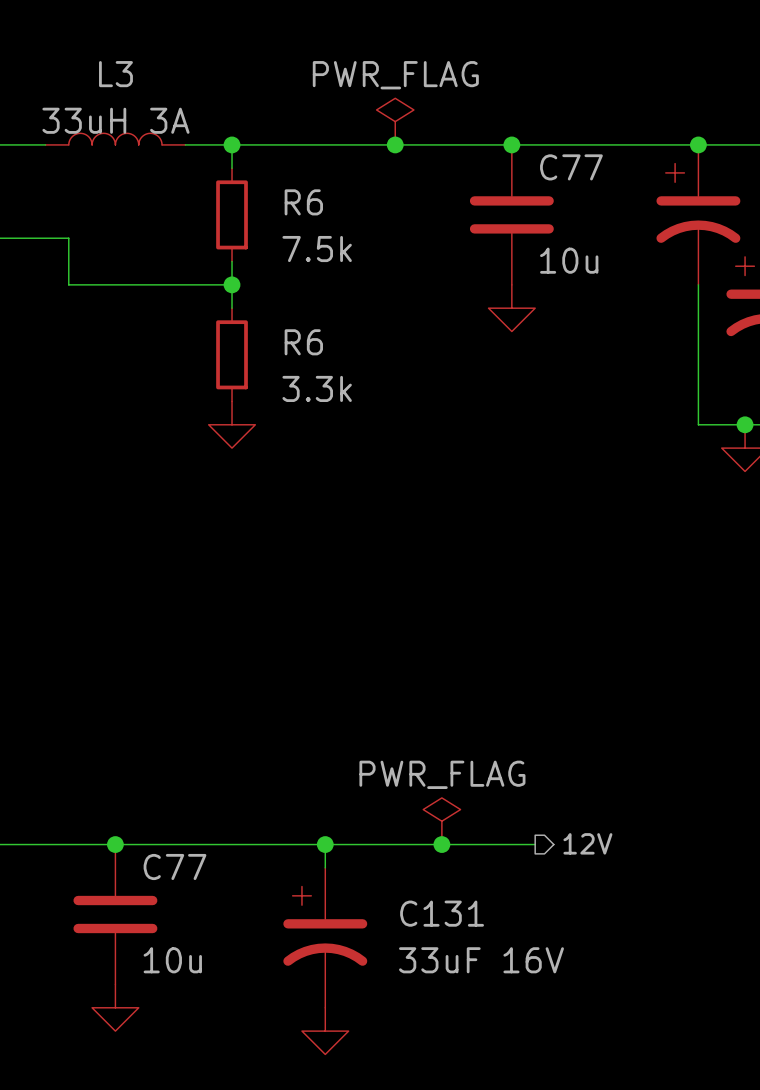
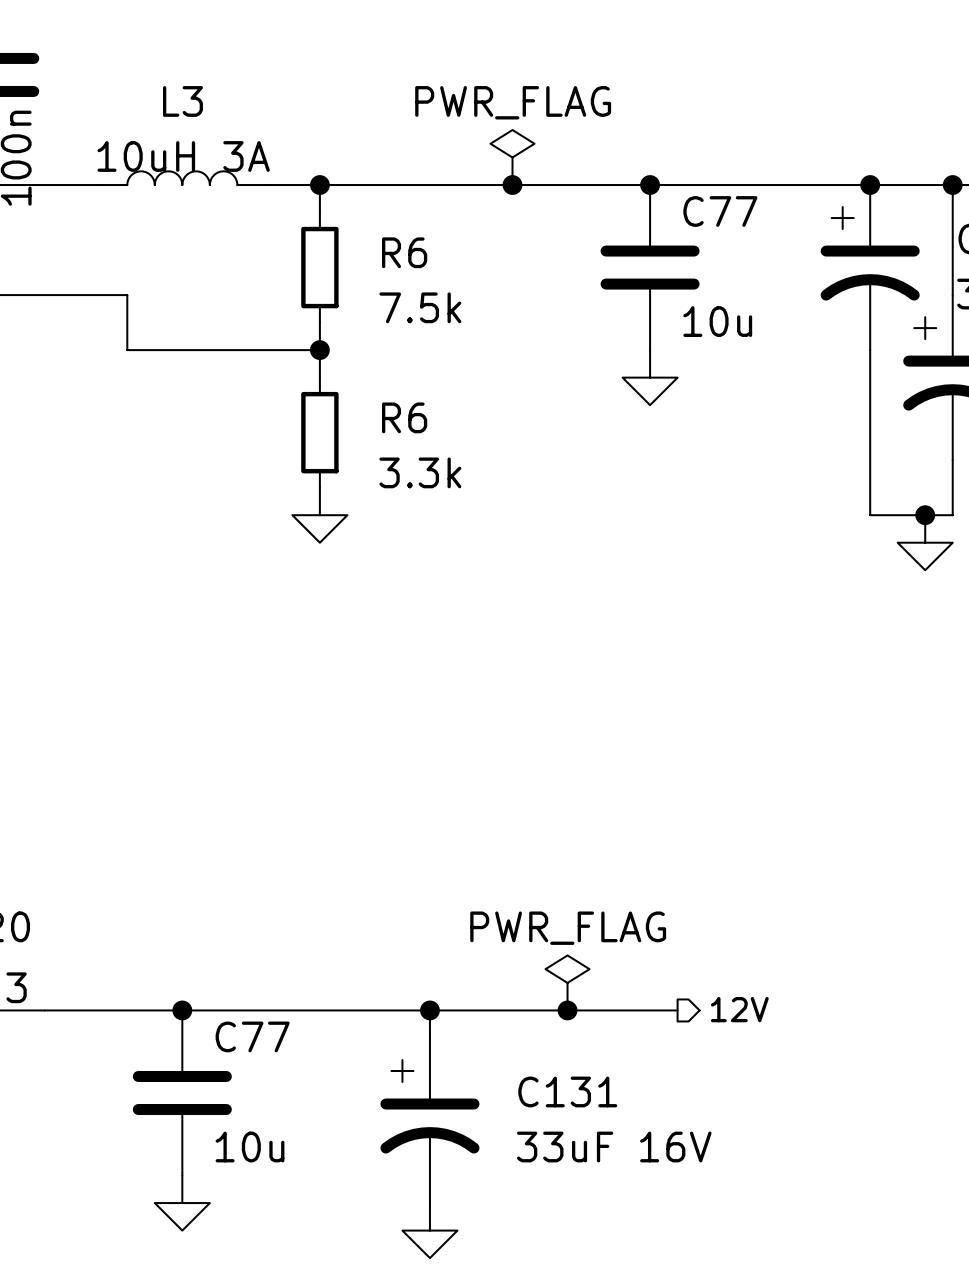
L3 value: 33uH 3A (115, 120) -> 10uH 3A (183, 156)

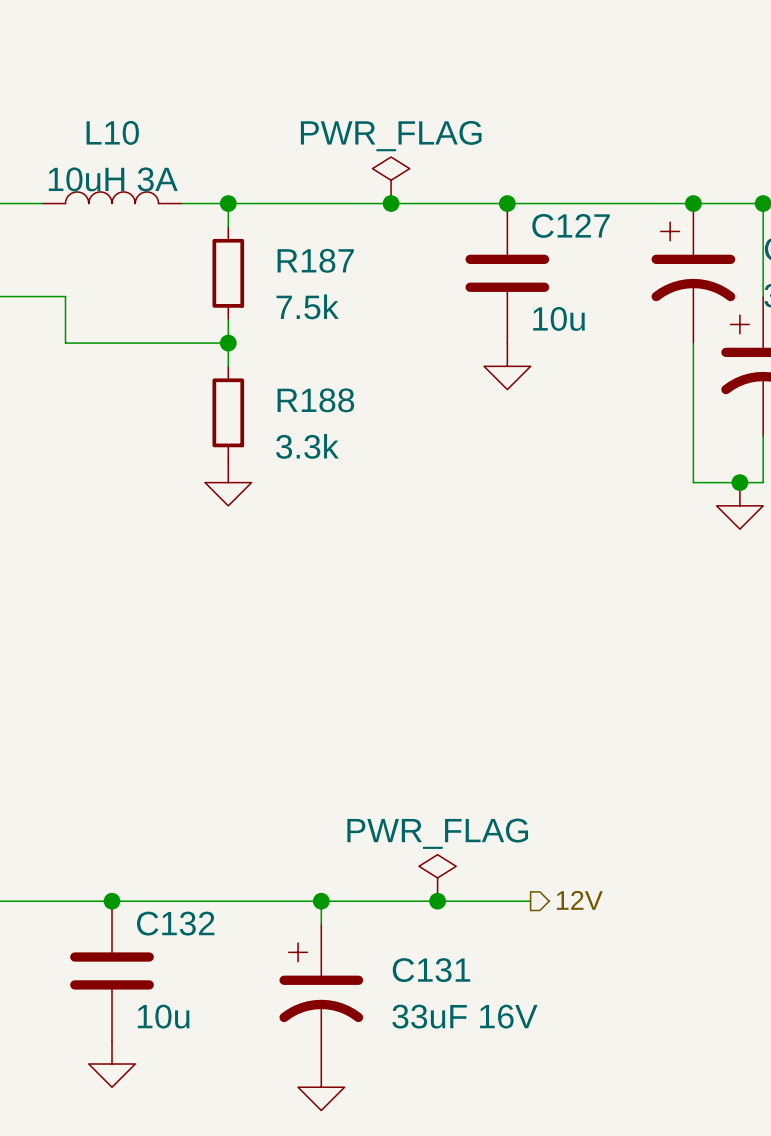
L3 name: L3 (182, 101) -> L10 (112, 132)
C77 name: C77 (720, 211) -> C127 (571, 225)
R6 name: R6 (404, 252) -> R187 (315, 260)
R6 name: R6 (404, 417) -> R188 (315, 400)
C77 name: C77 (252, 1036) -> C132 (175, 923)

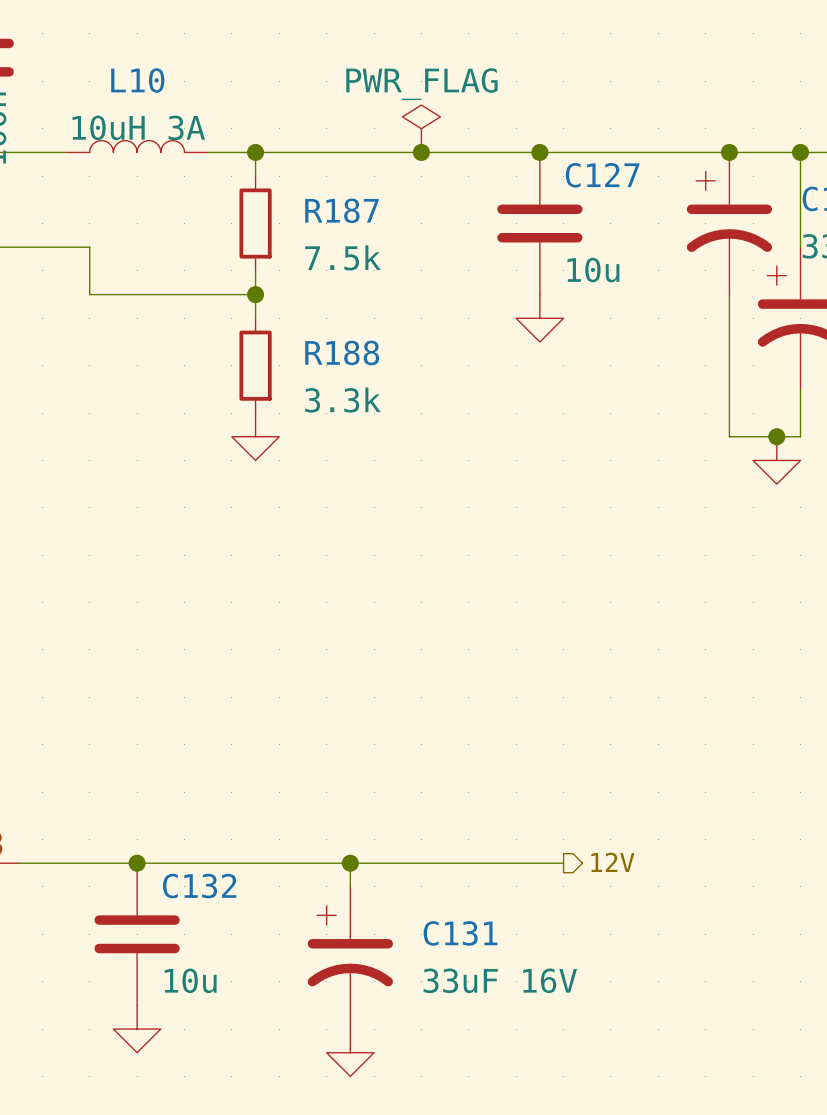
power symbol: PWR_FLAG (437, 877) -> none
junction: (437, 901) -> none

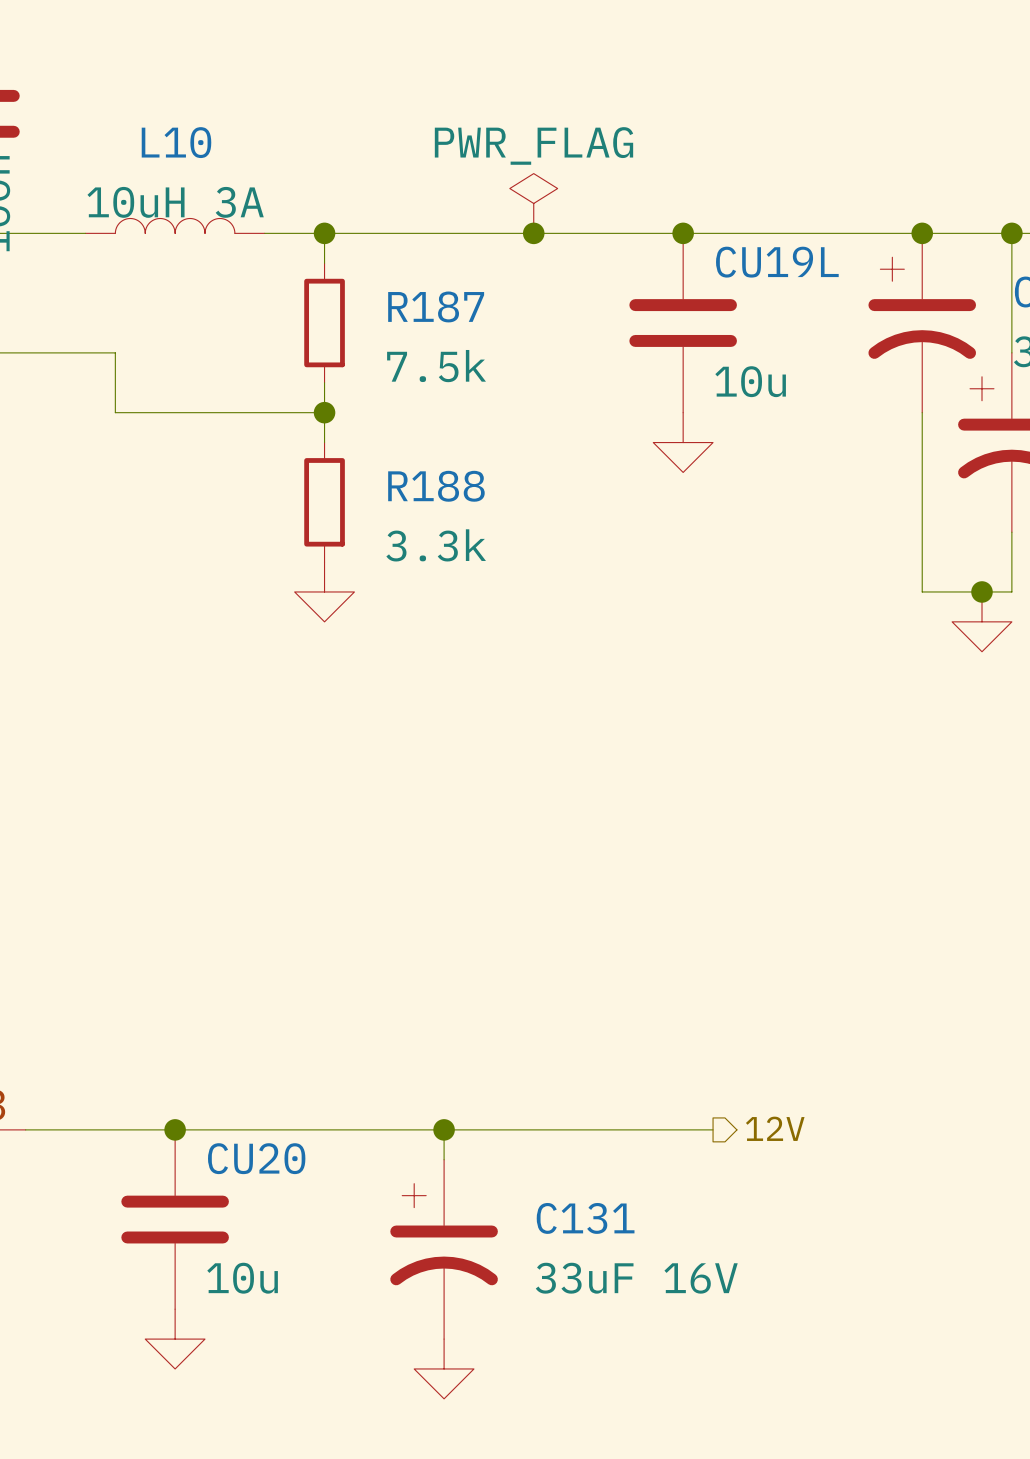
C127 name: C127 (602, 175) -> CU19L (777, 262)
C132 name: C132 (199, 886) -> CU20 (256, 1158)

